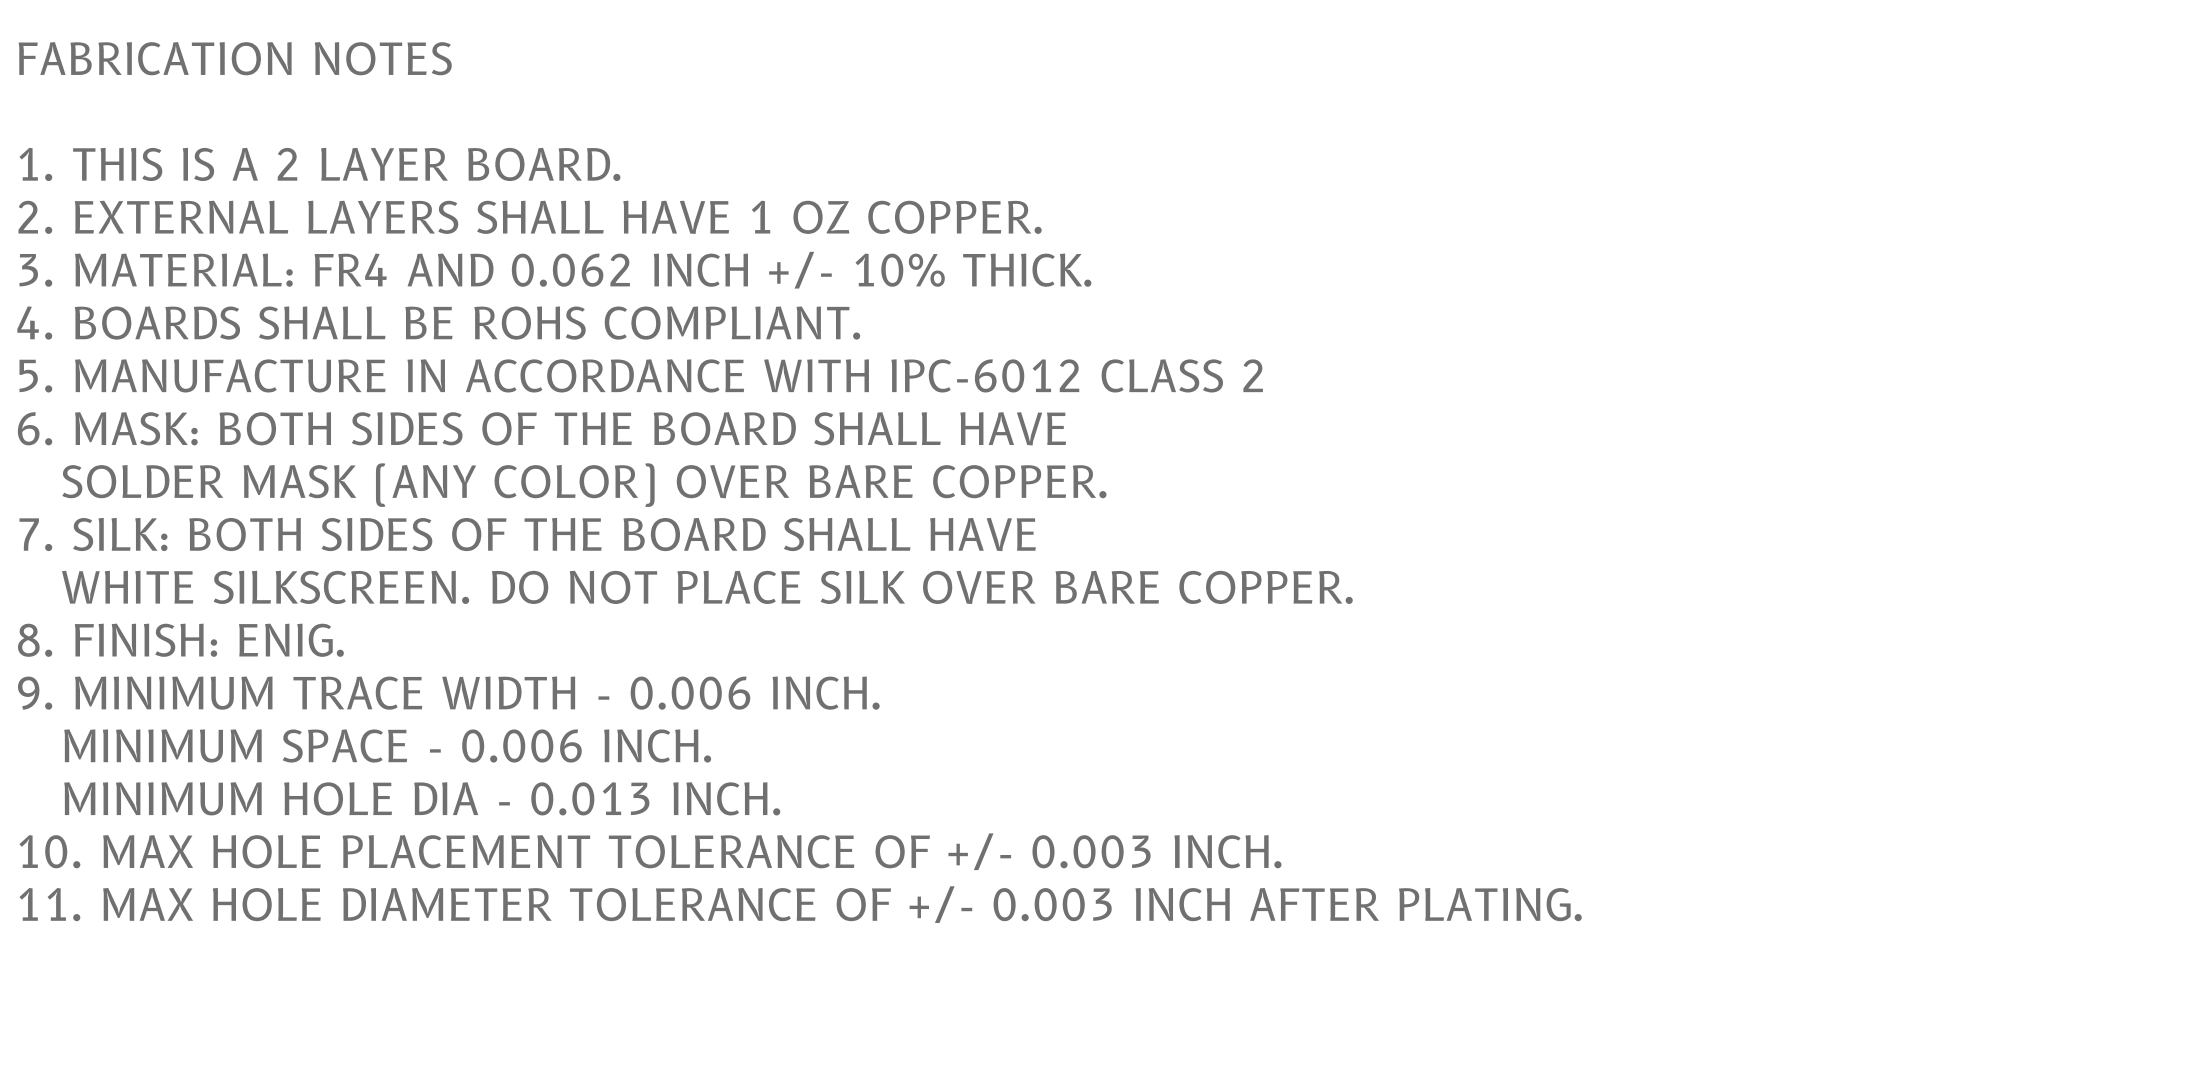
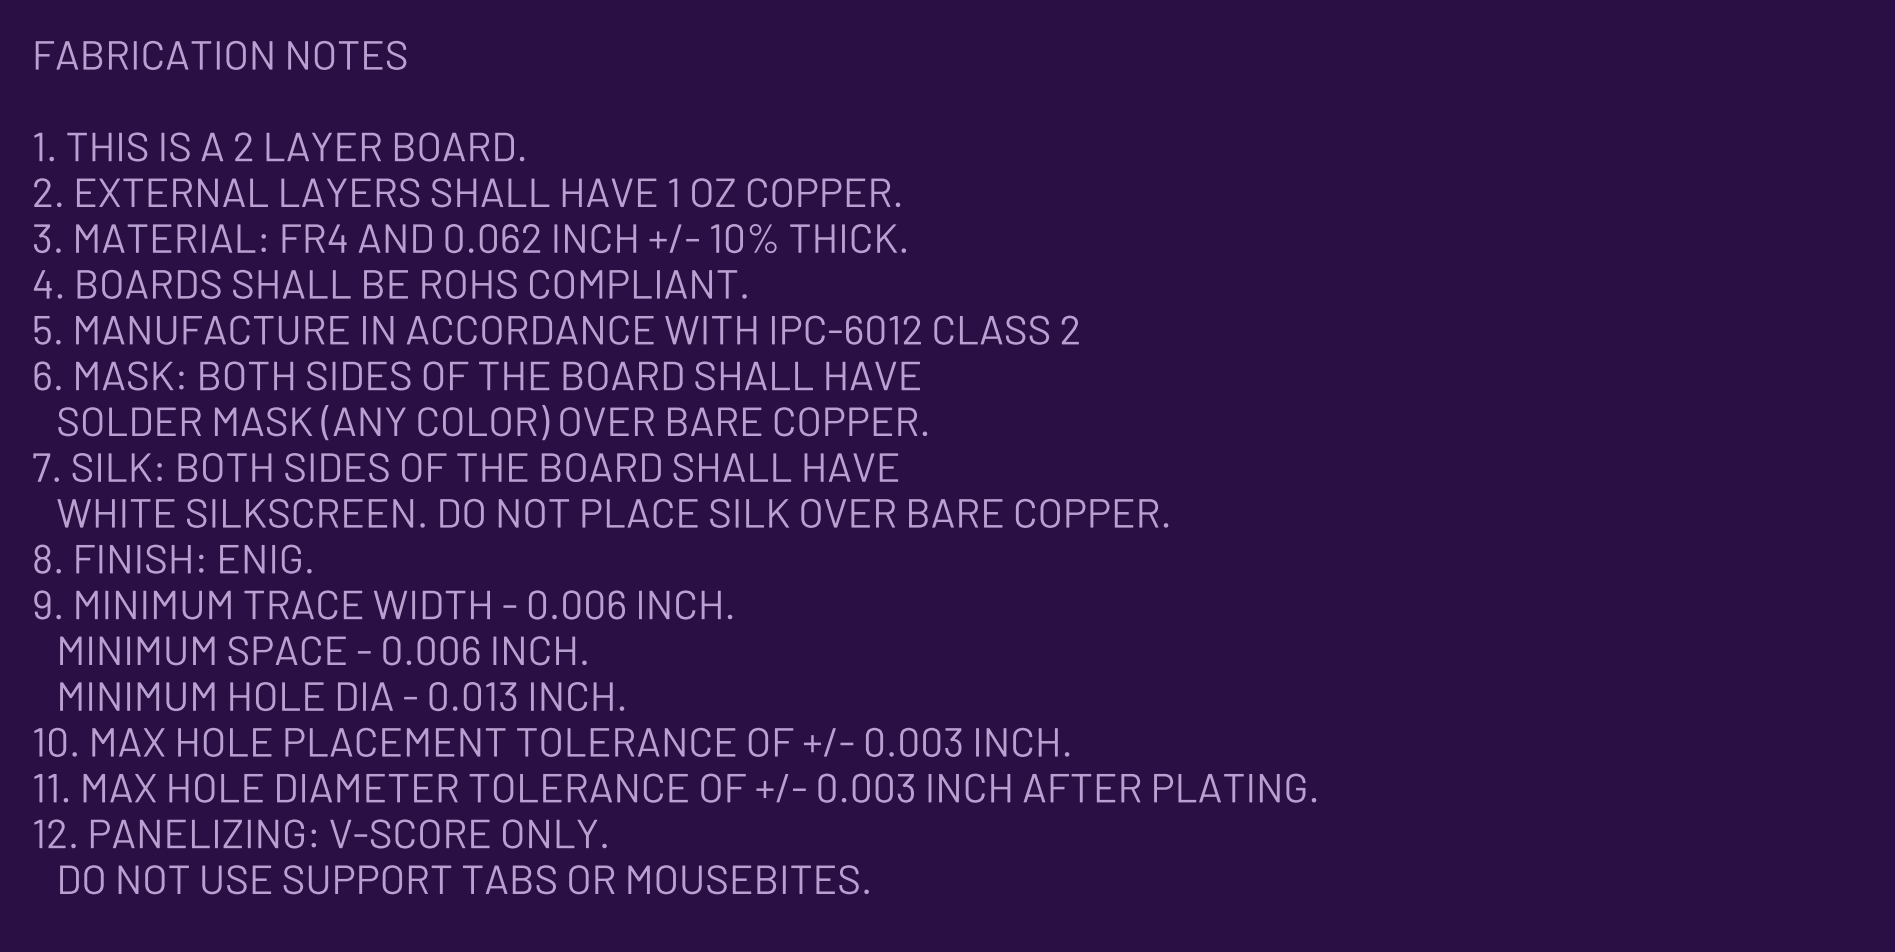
text: none -> 12. PANELIZING: V-SCORE ONLY. (320, 833)
text: none -> DO NOT USE SUPPORT TABS OR MOUSEBITES. (464, 879)

